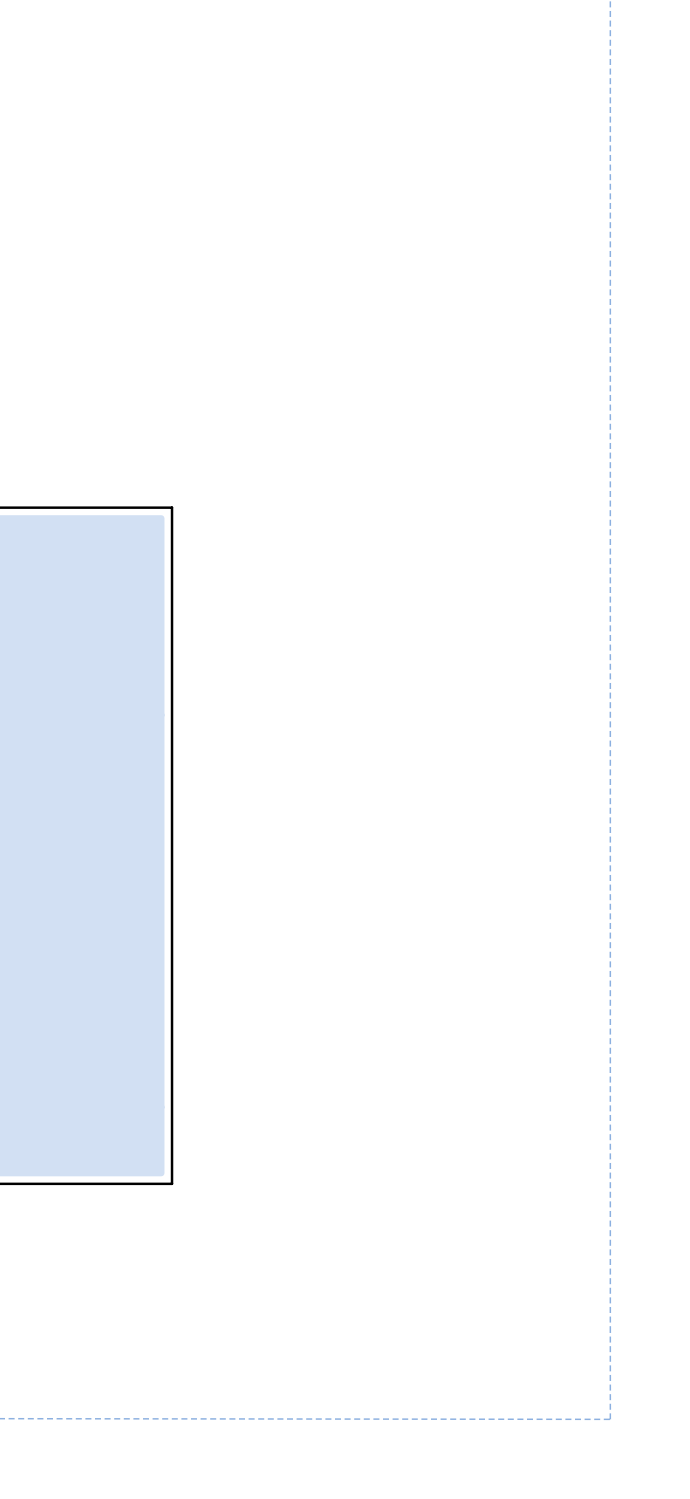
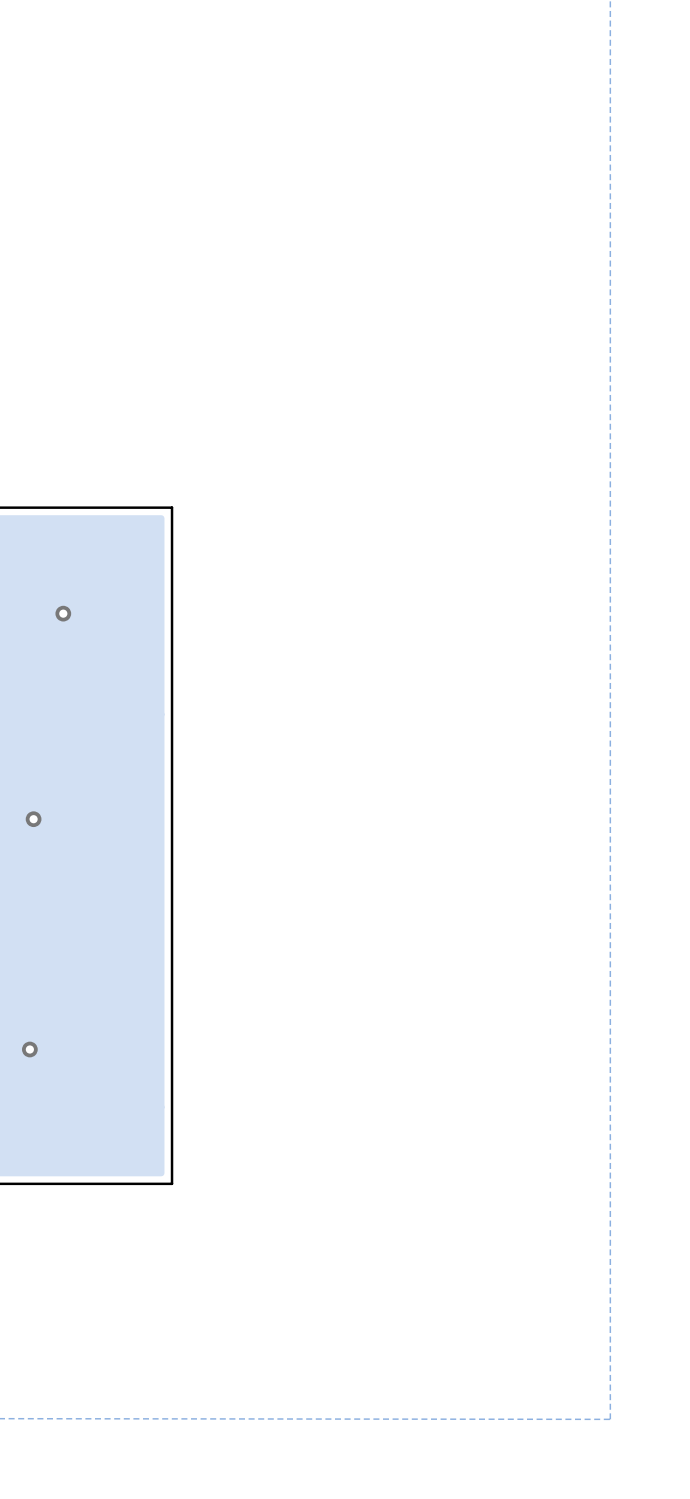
via: none -> (63, 613)
via: none -> (33, 819)
via: none -> (29, 1049)

